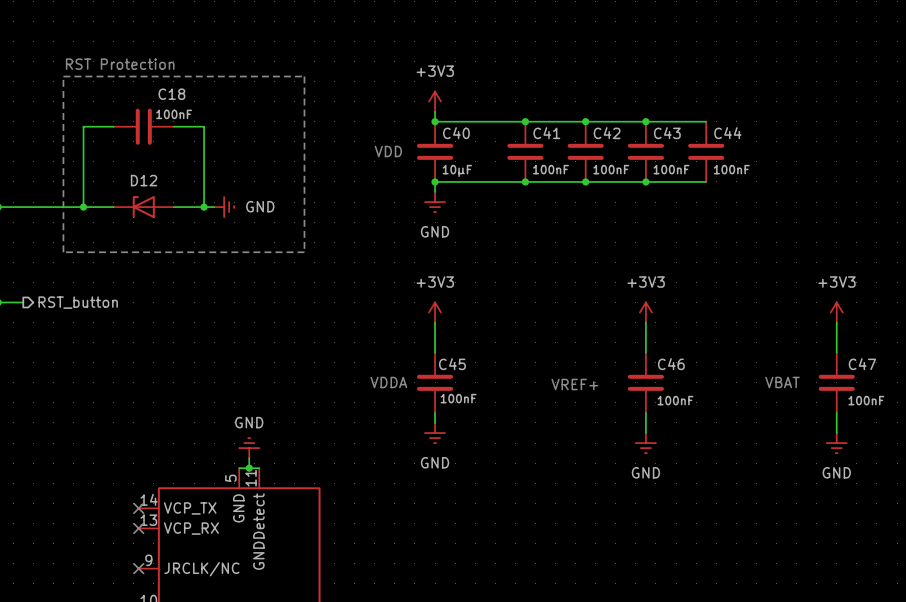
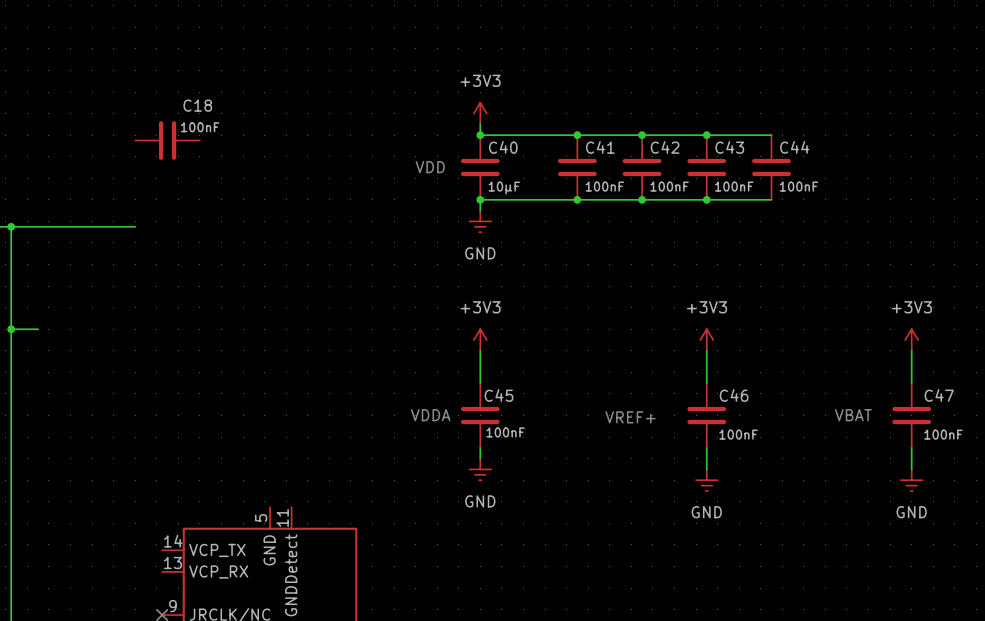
text: RST Protection (120, 64) -> none
line: (63, 76) (304, 76) (304, 252) (63, 252) (63, 76) -> none
wire: (113, 126) (83, 126) (83, 207) -> none
wire: (173, 126) (204, 126) (204, 207) -> none
junction: (83, 207) -> none
D12: (143, 207) -> none
wire: (173, 207) (214, 207) -> none
junction: (204, 207) -> none
power symbol: GND (224, 207) -> none
hierarchical label: RST_button (78, 302) -> none
power symbol: GND (249, 448) -> none
wire: (249, 458) (249, 468) -> none
wire: (239, 468) (259, 468) -> none
junction: (249, 468) -> none
no-connect mark: (138, 508) -> none
no-connect mark: (138, 528) -> none

